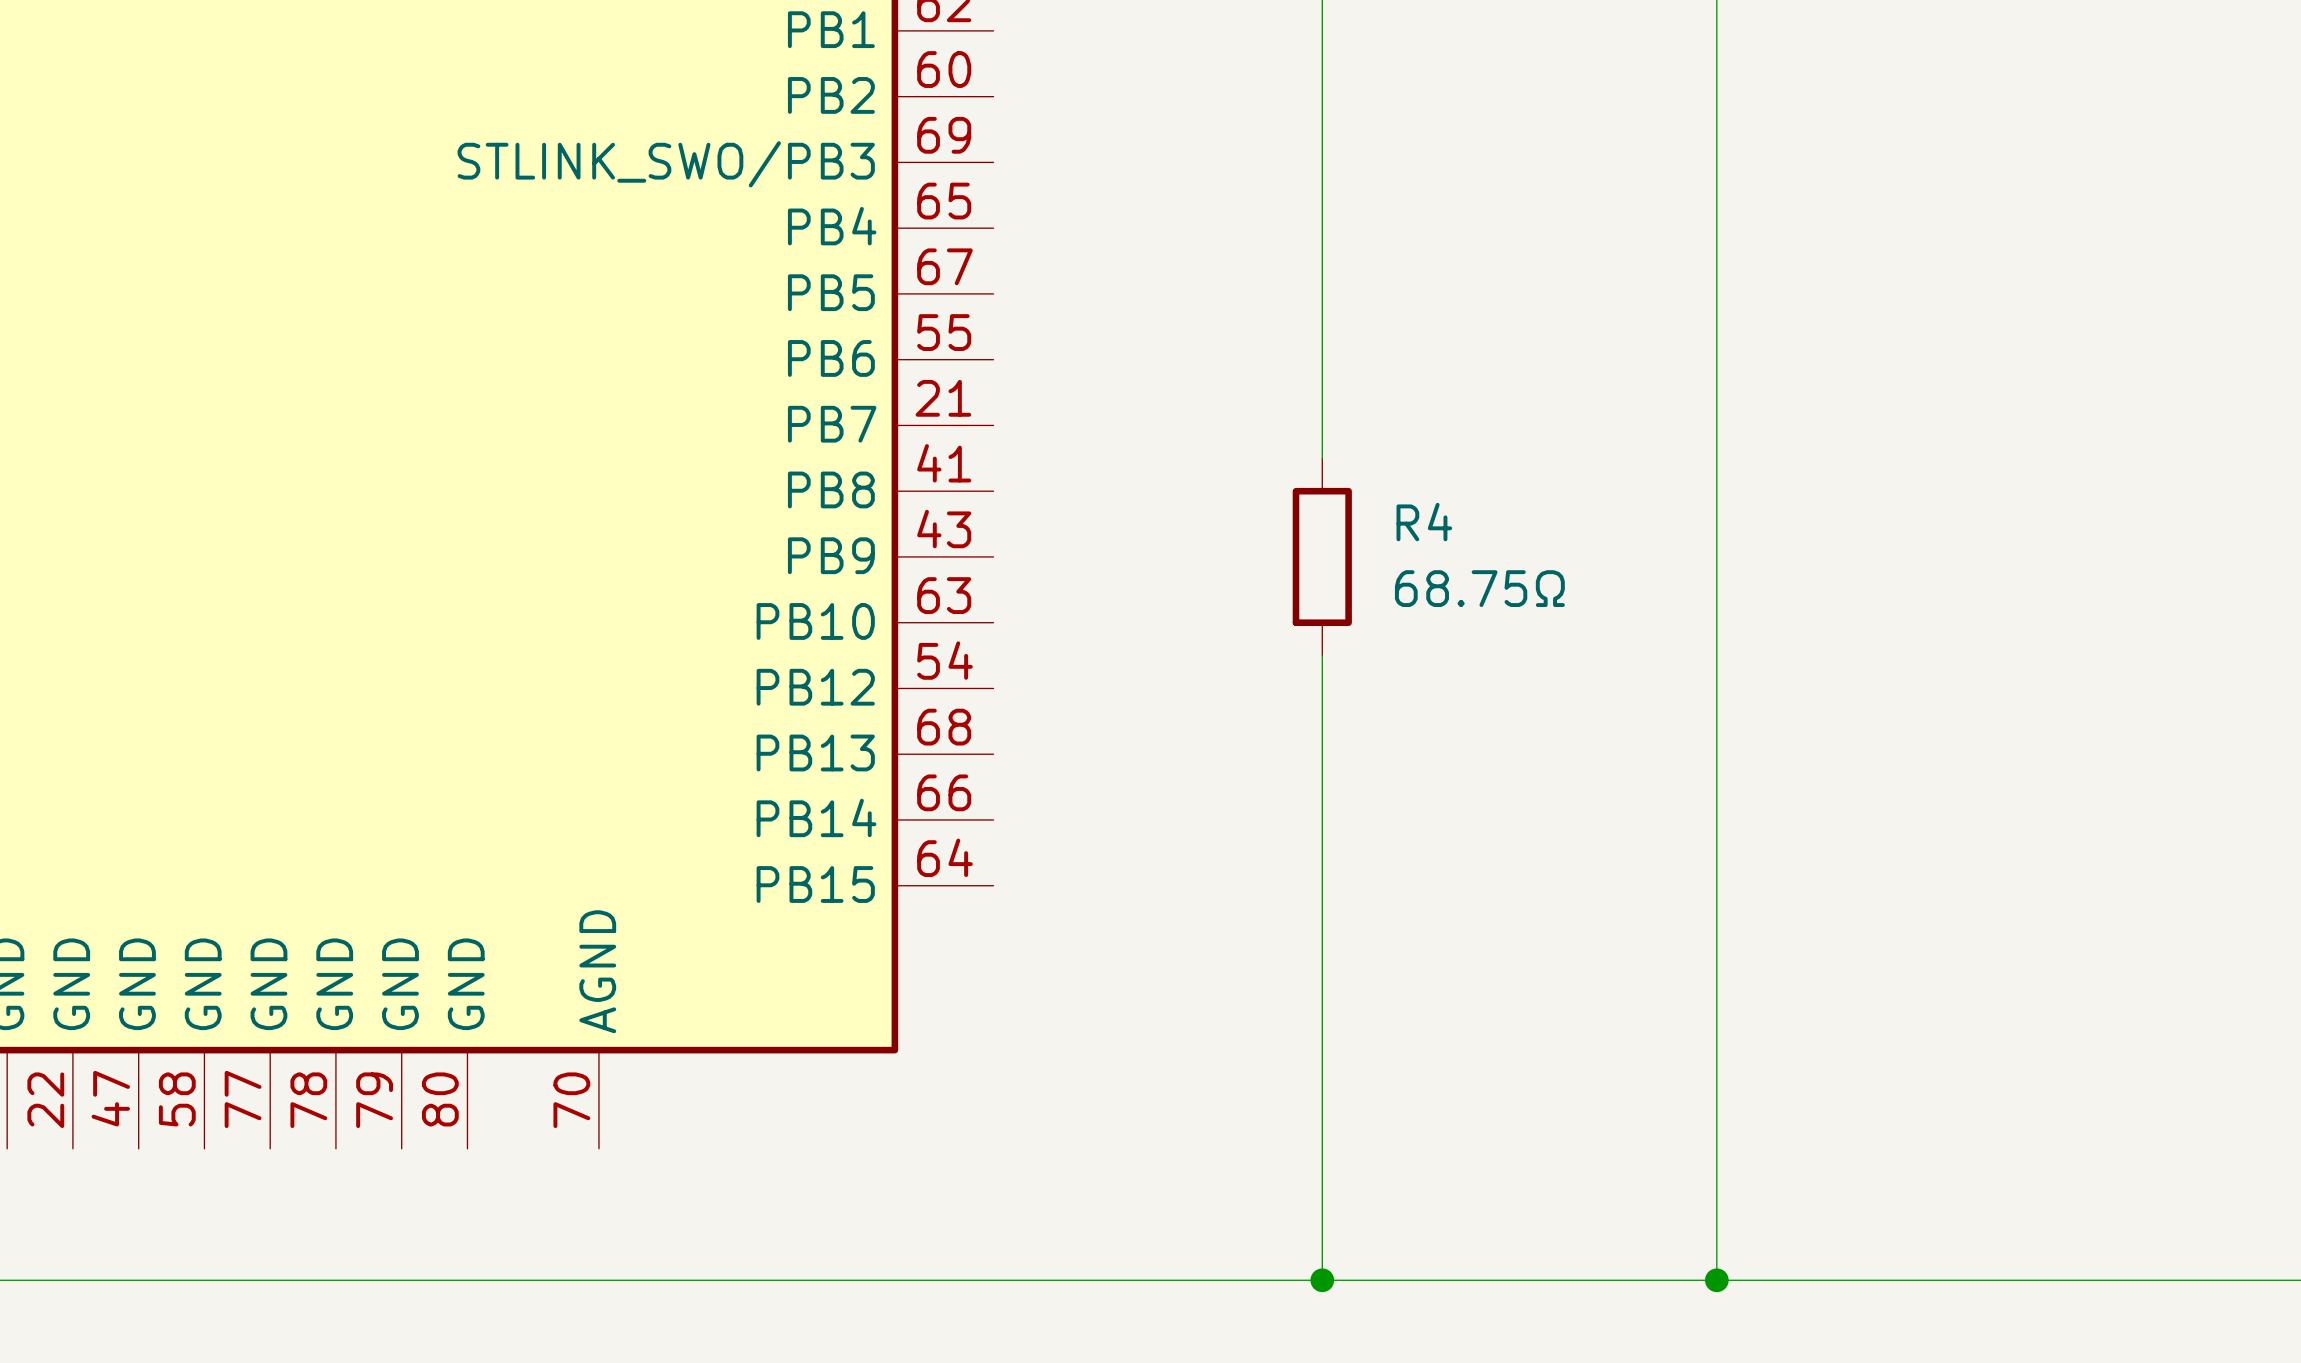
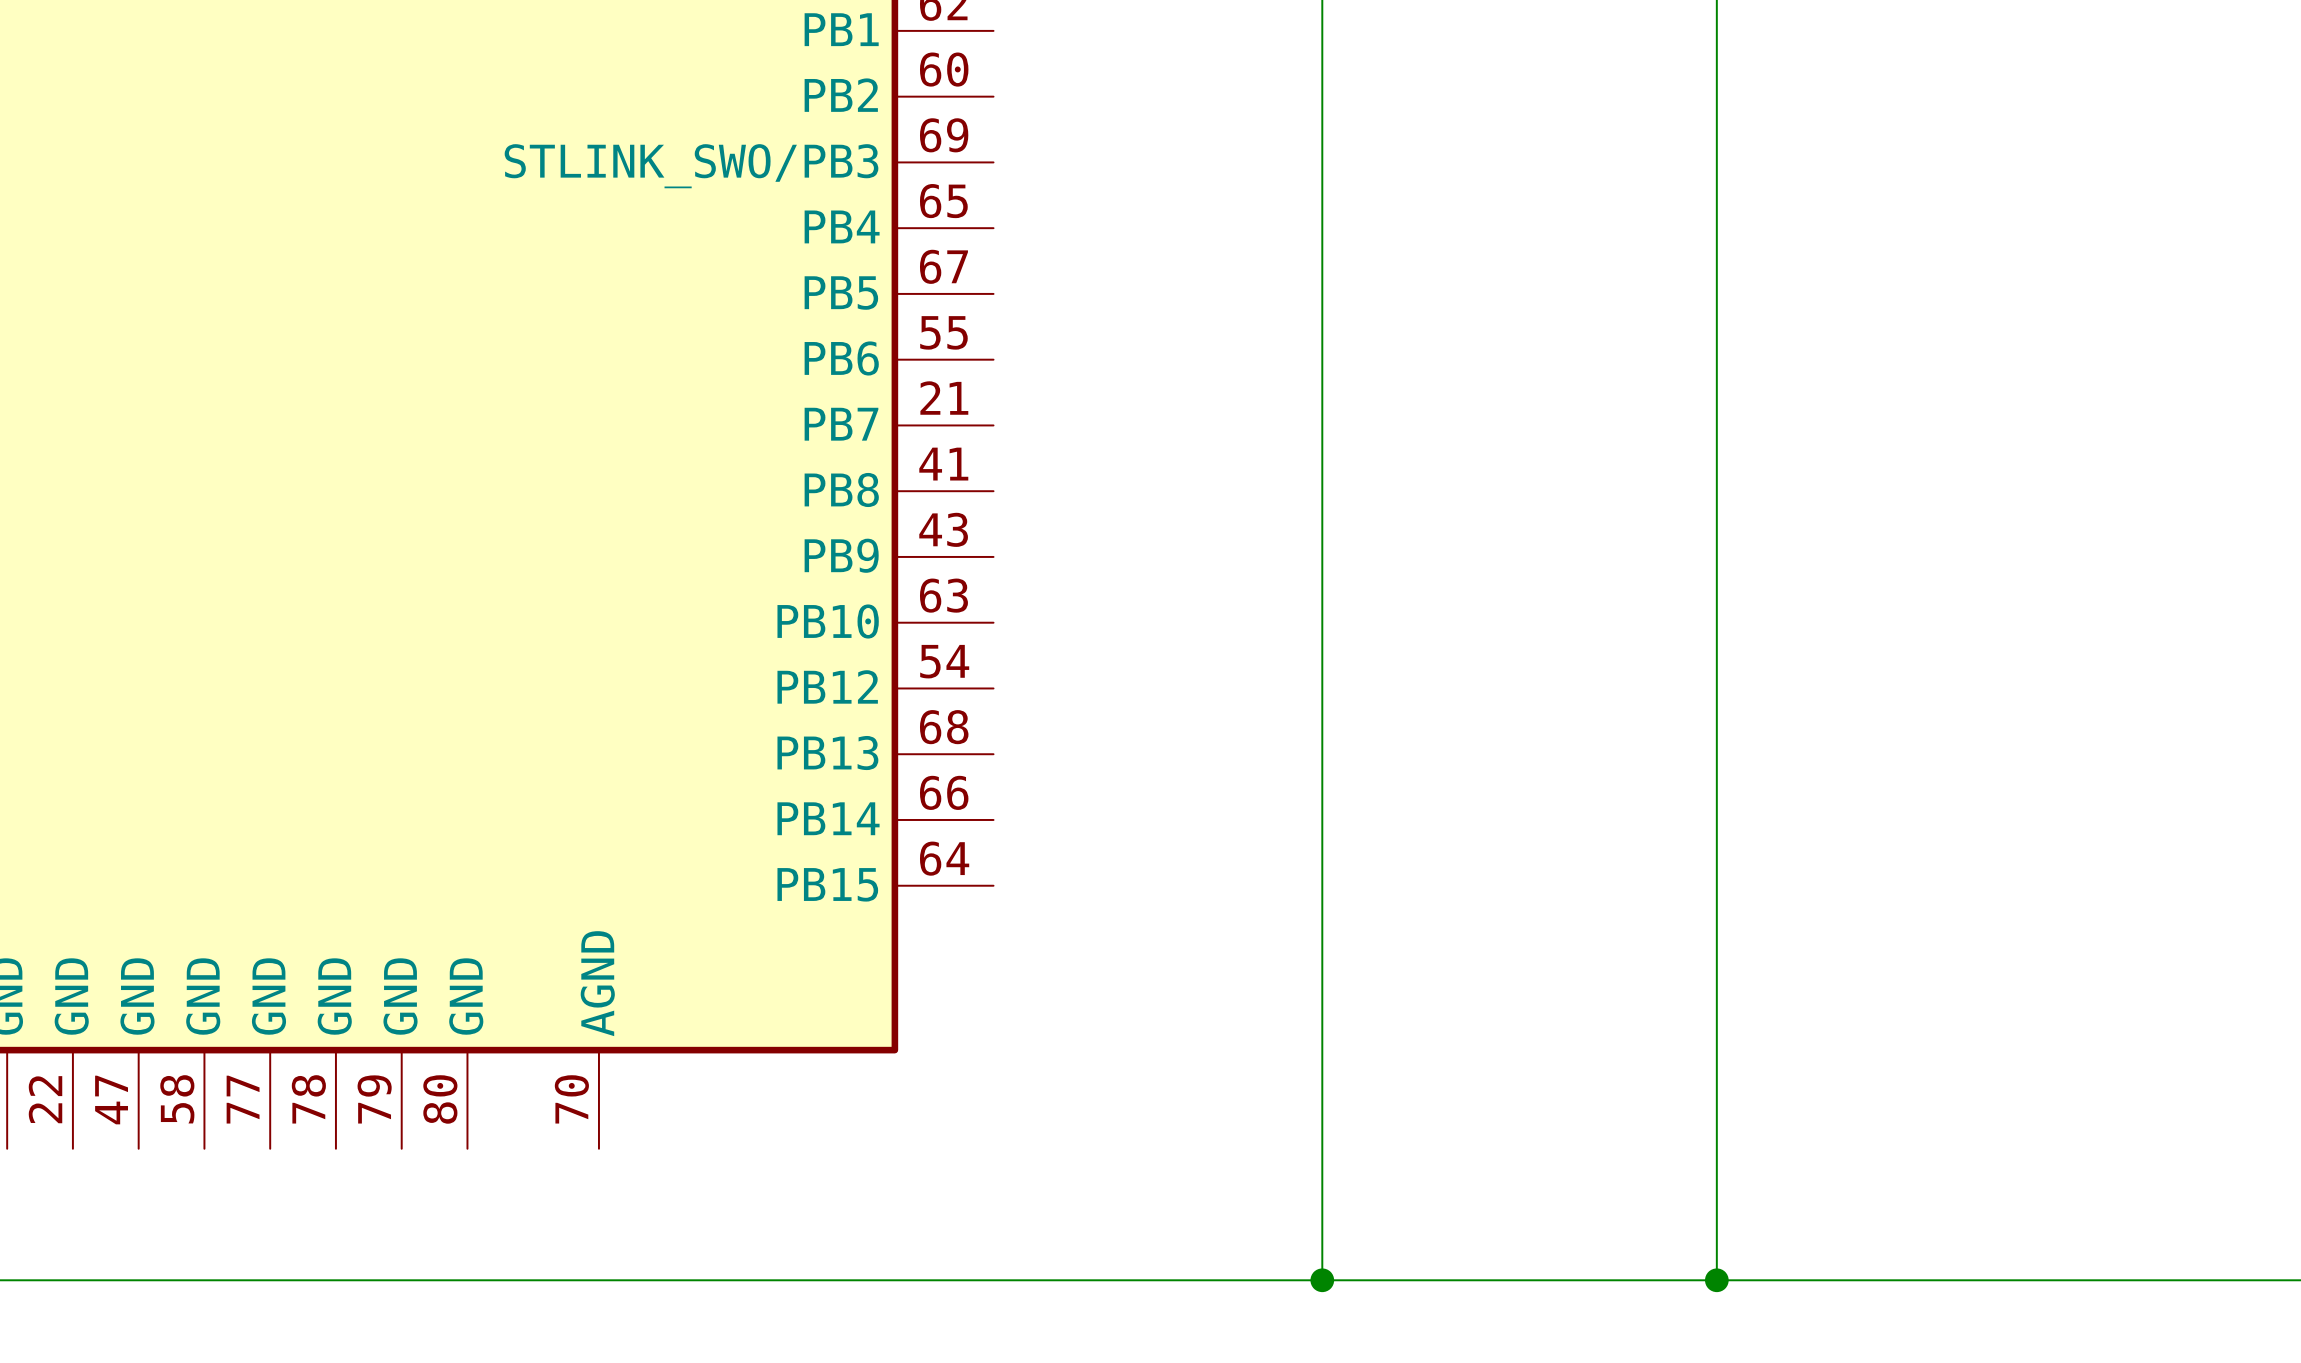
wire: none -> (1322, 458) (1322, 655)
R4: 68.75Ω (1322, 556) -> none

